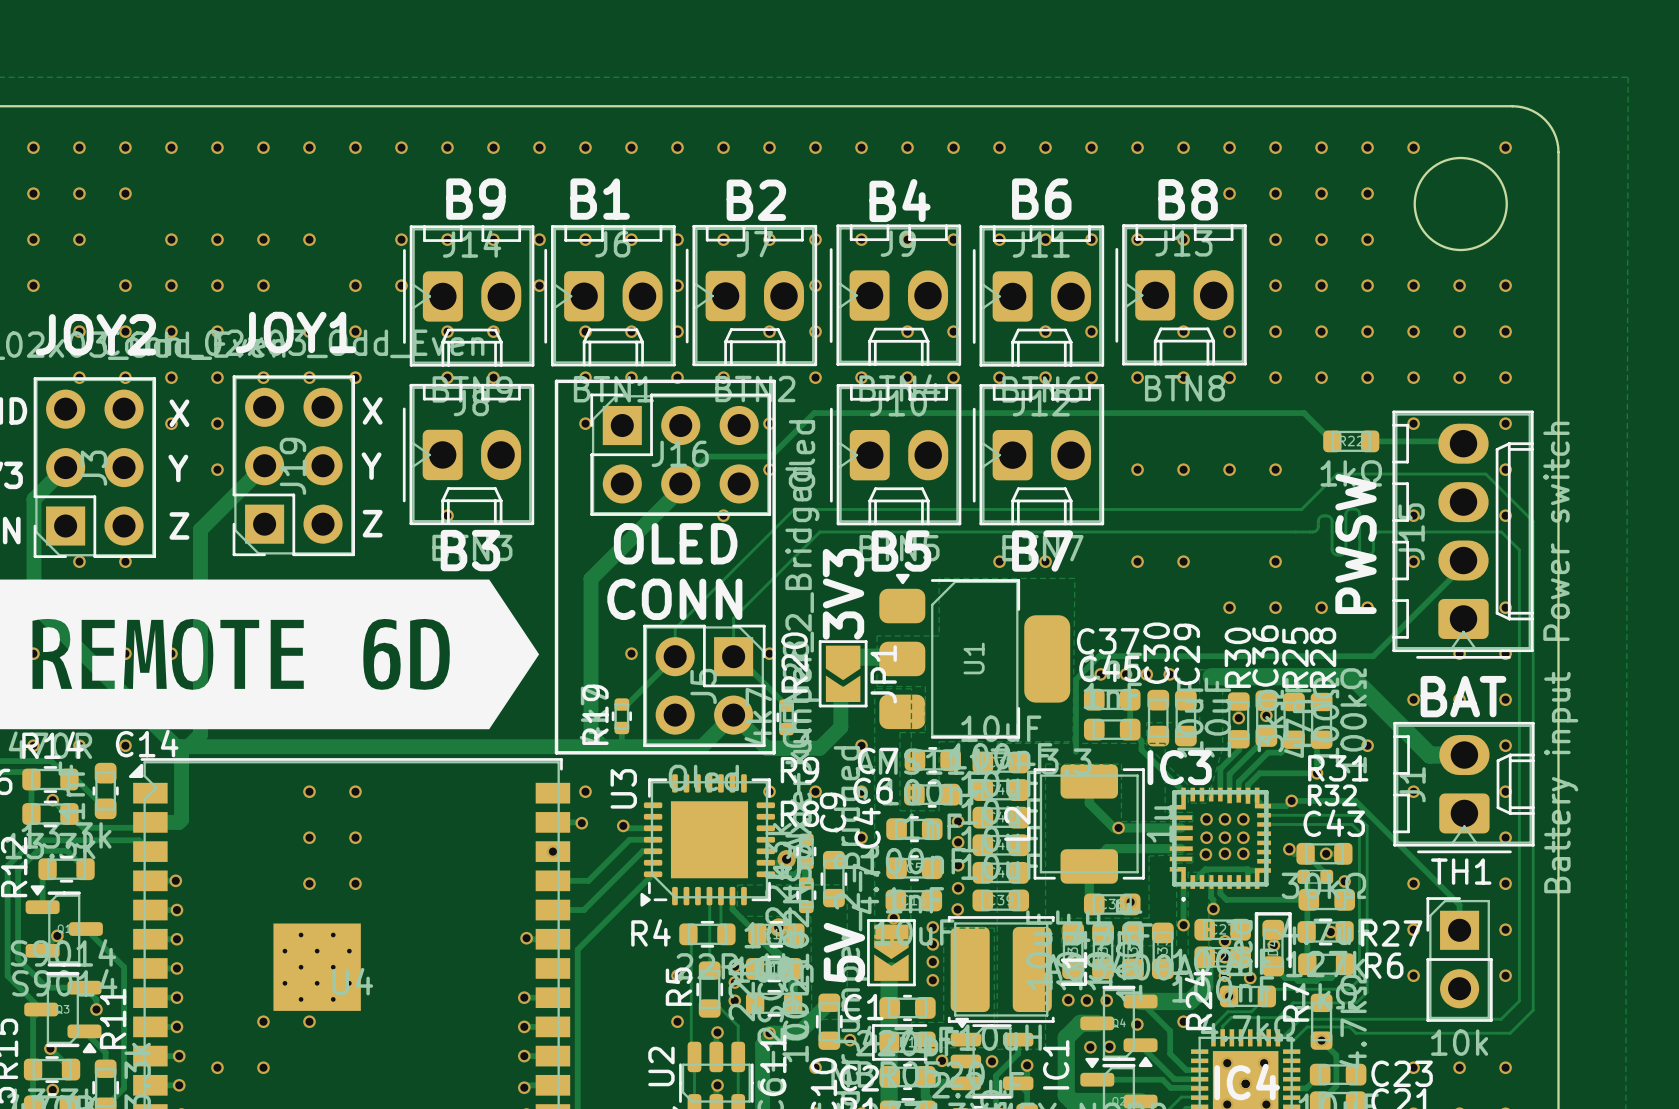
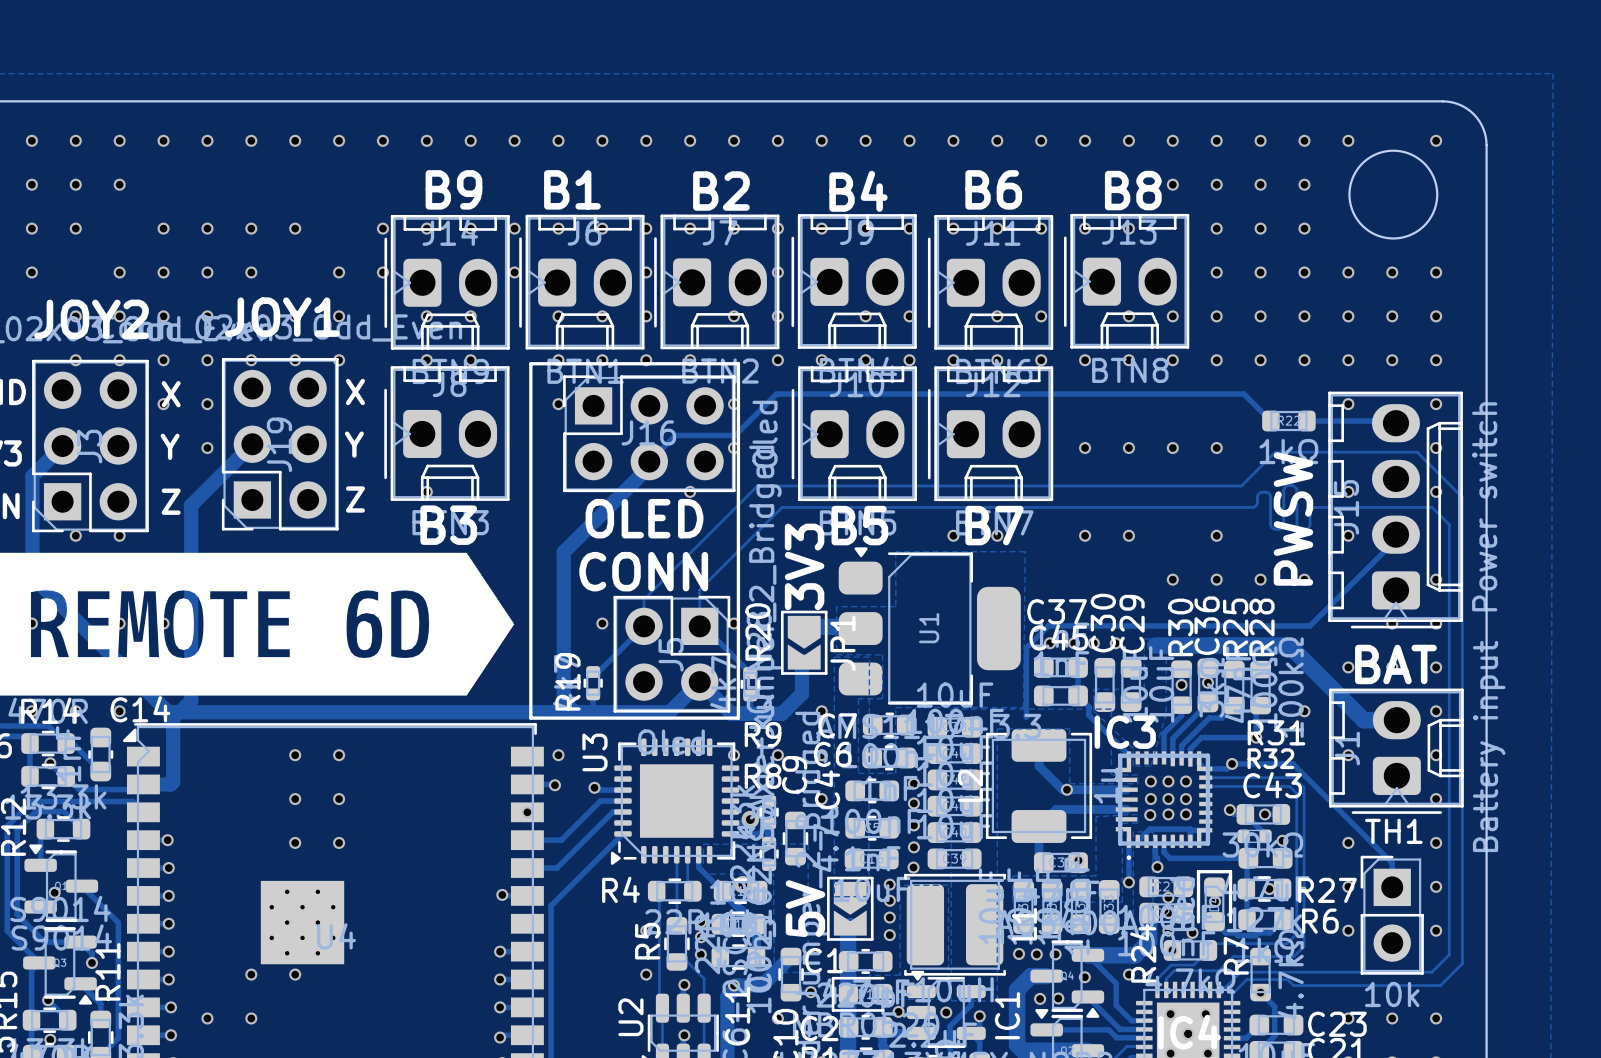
via: (893, 918) -> none

